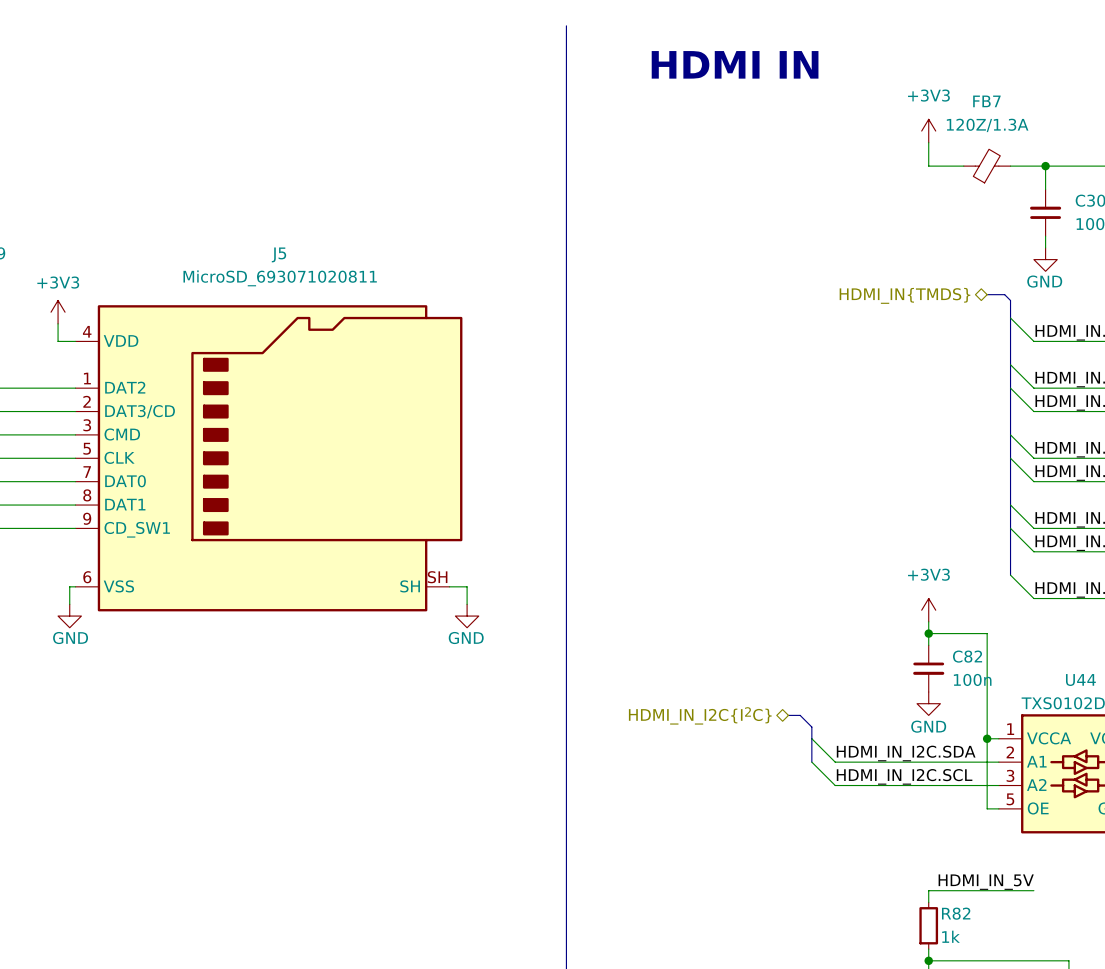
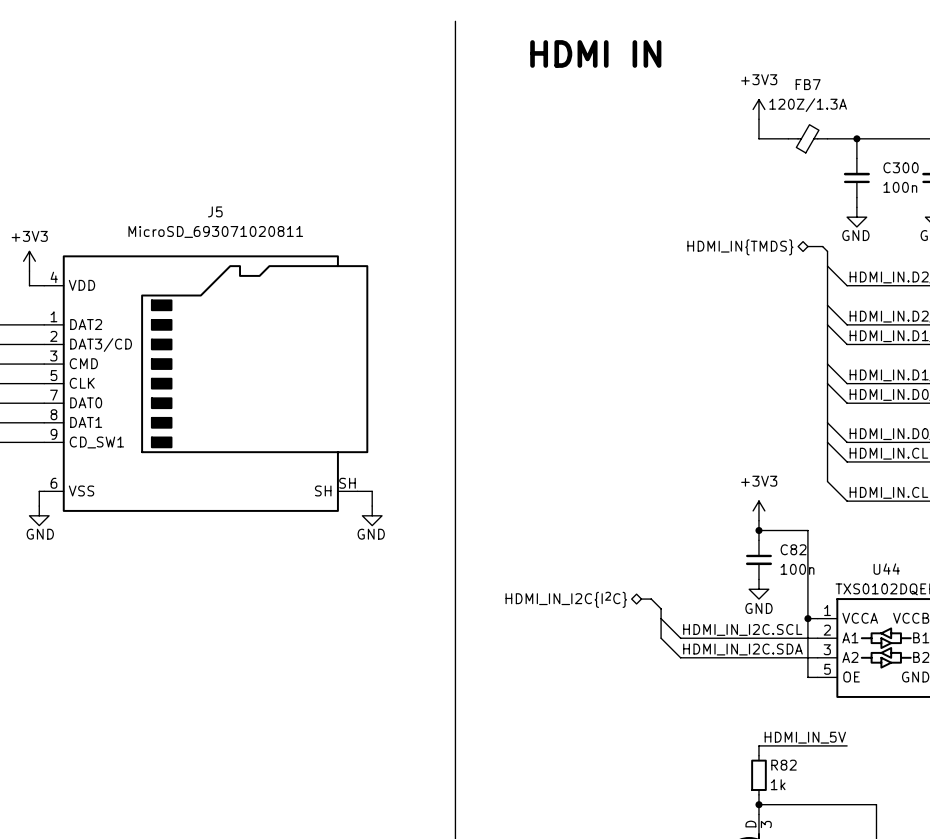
label: HDMI_IN_I2C.SDA (906, 753) -> HDMI_IN_I2C.SCL (742, 629)
label: HDMI_IN_I2C.SCL (904, 776) -> HDMI_IN_I2C.SDA (742, 649)

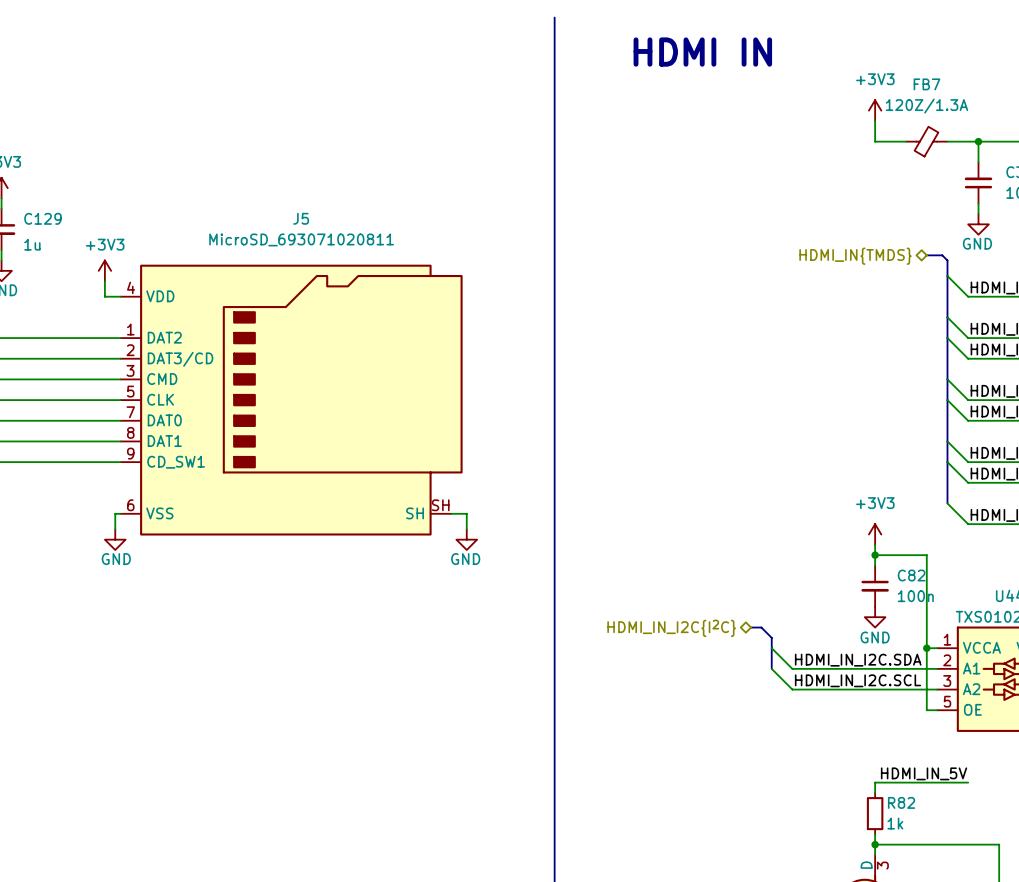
label: HDMI_IN_I2C.SCL (742, 629) -> HDMI_IN_I2C.SDA (858, 660)
label: HDMI_IN_I2C.SDA (742, 649) -> HDMI_IN_I2C.SCL (857, 680)

